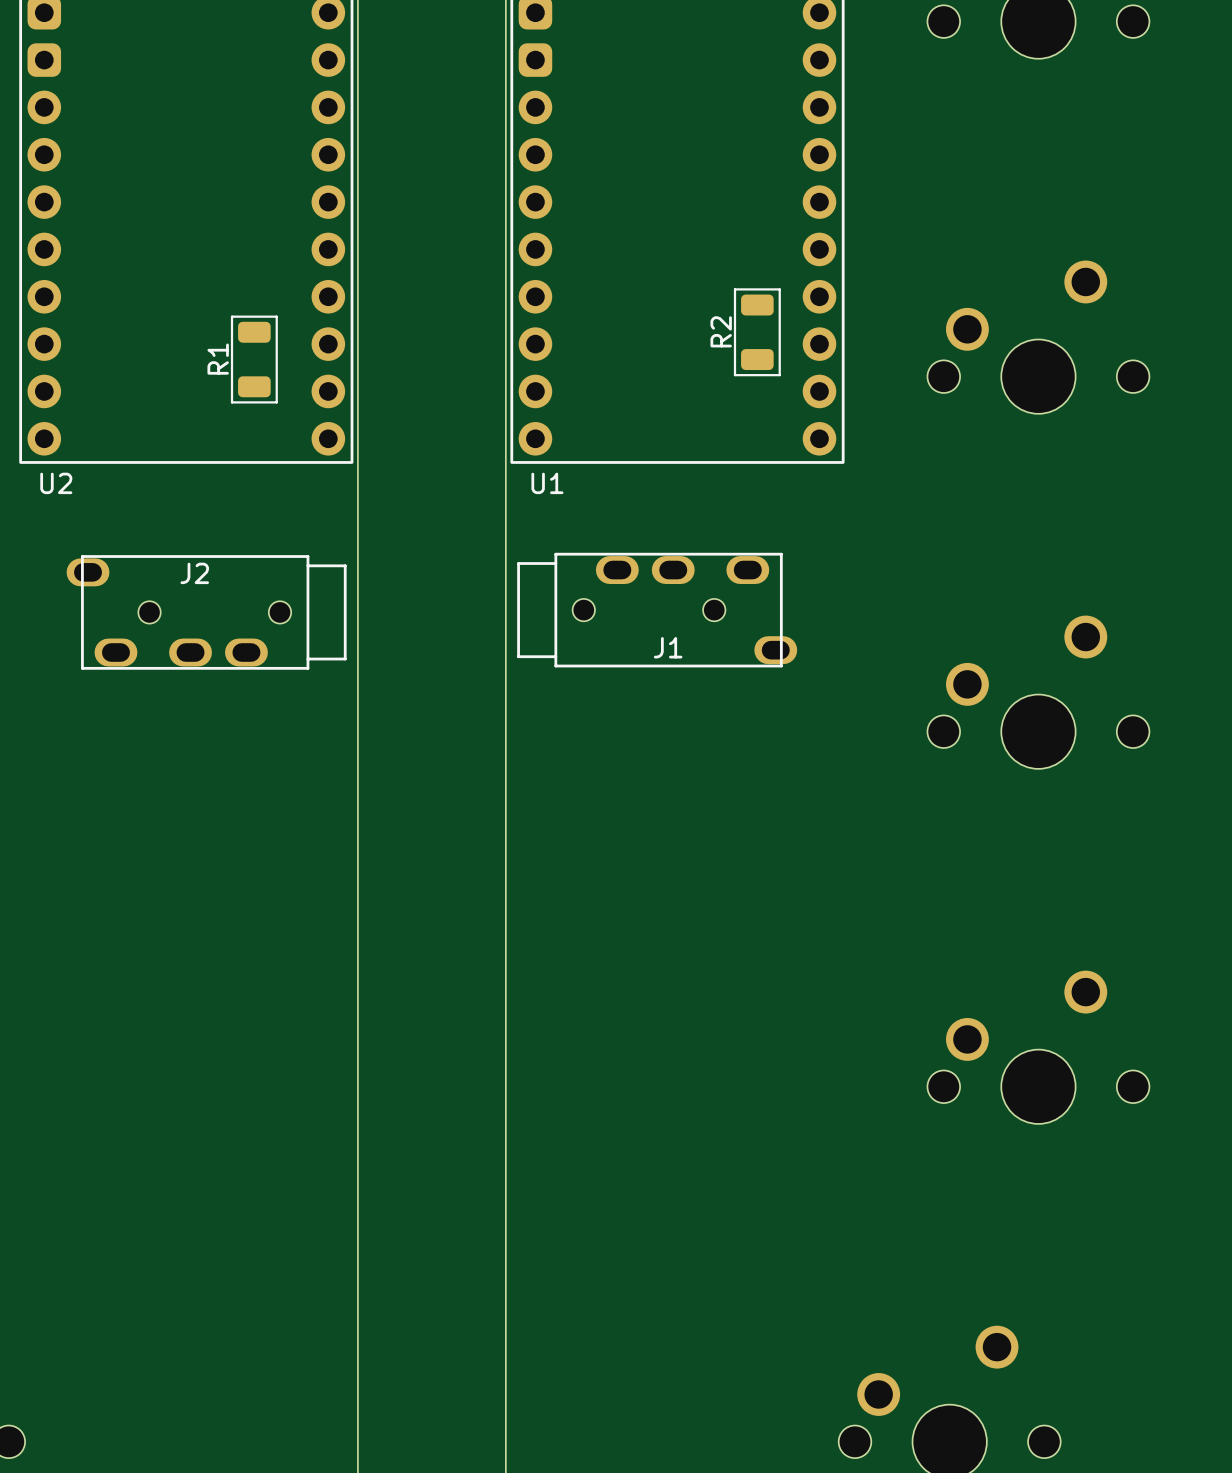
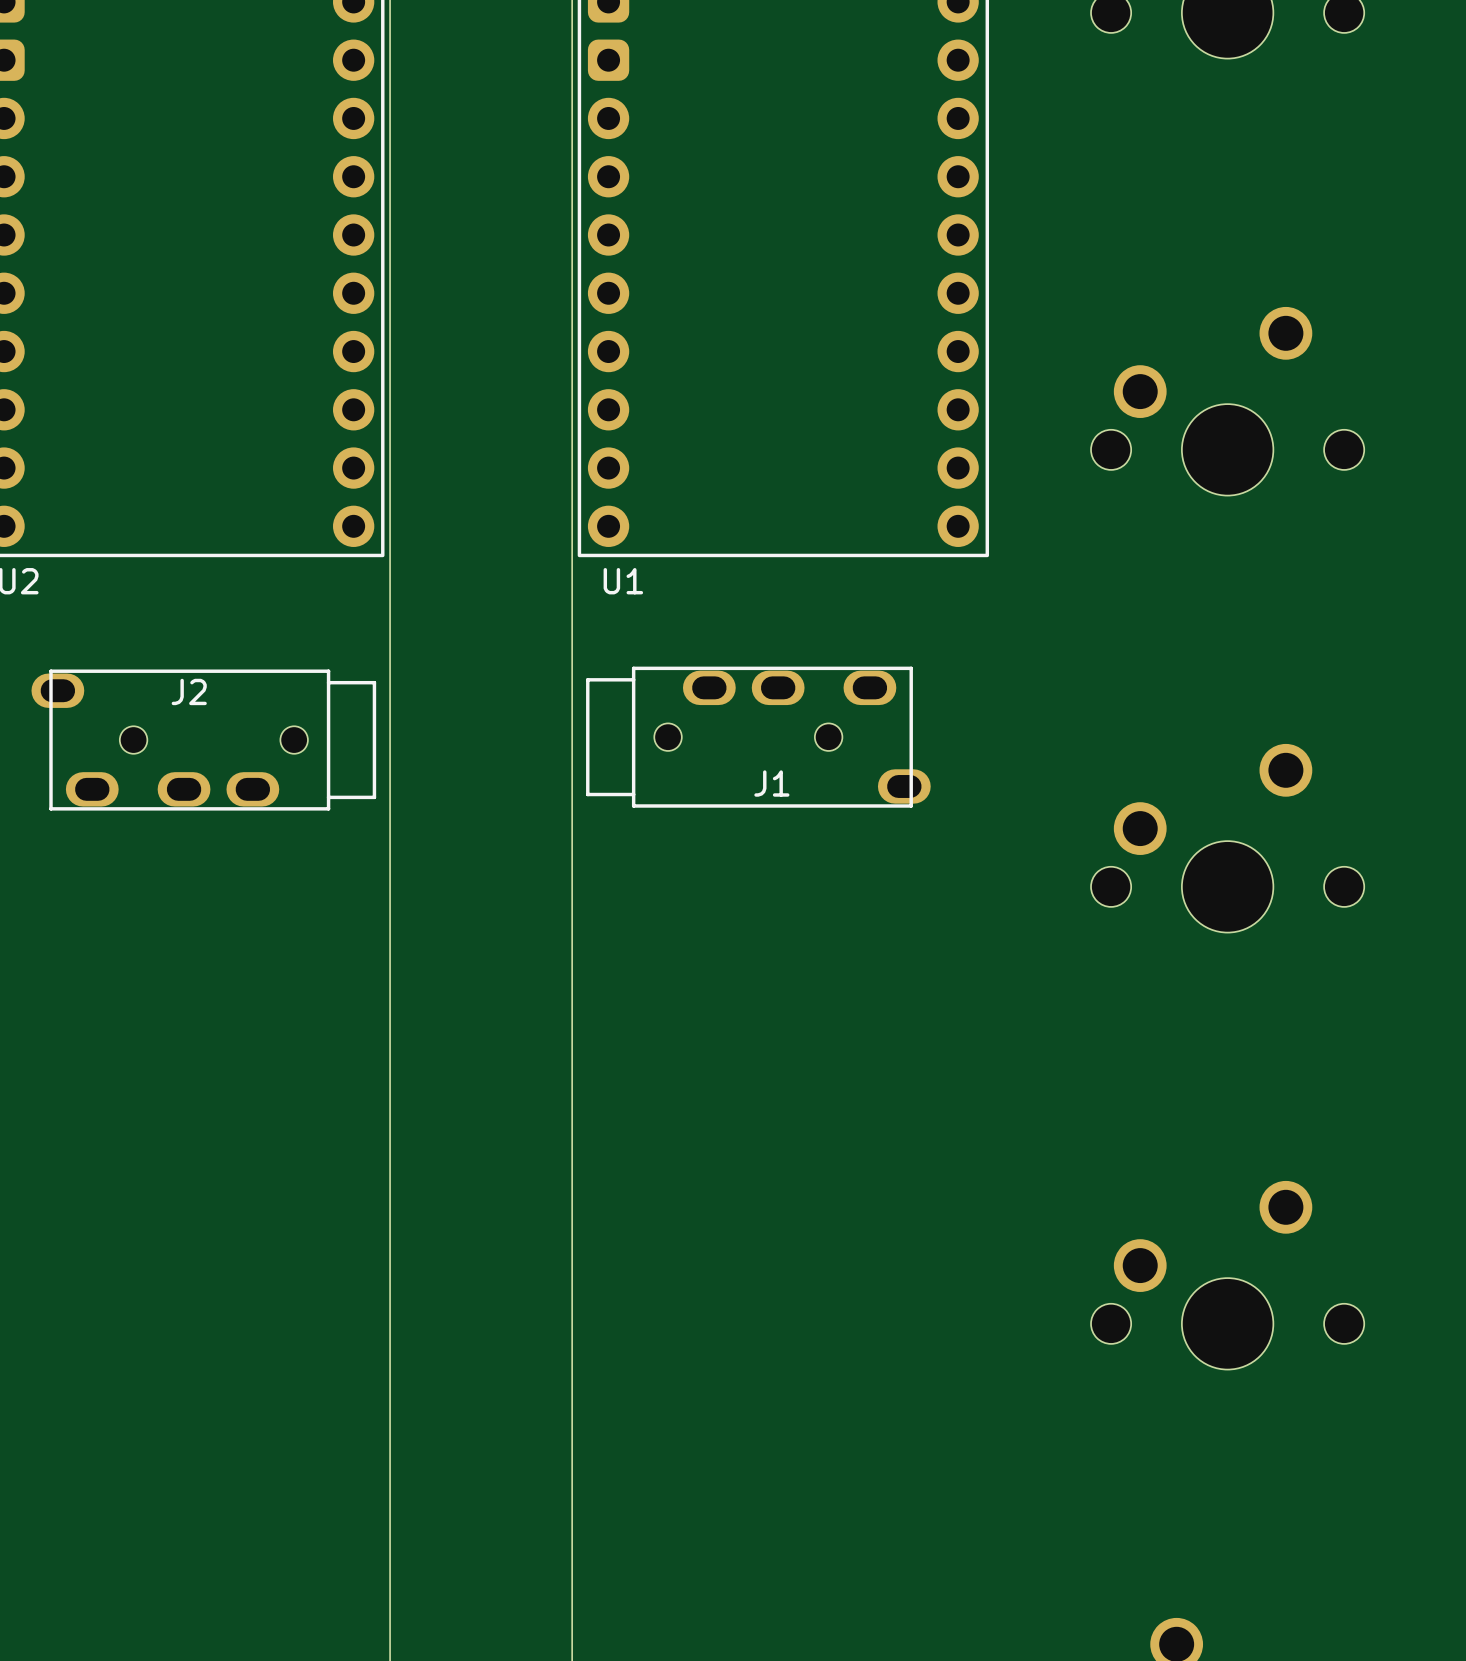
R2: (757, 332) -> none
R1: (254, 359) -> none

